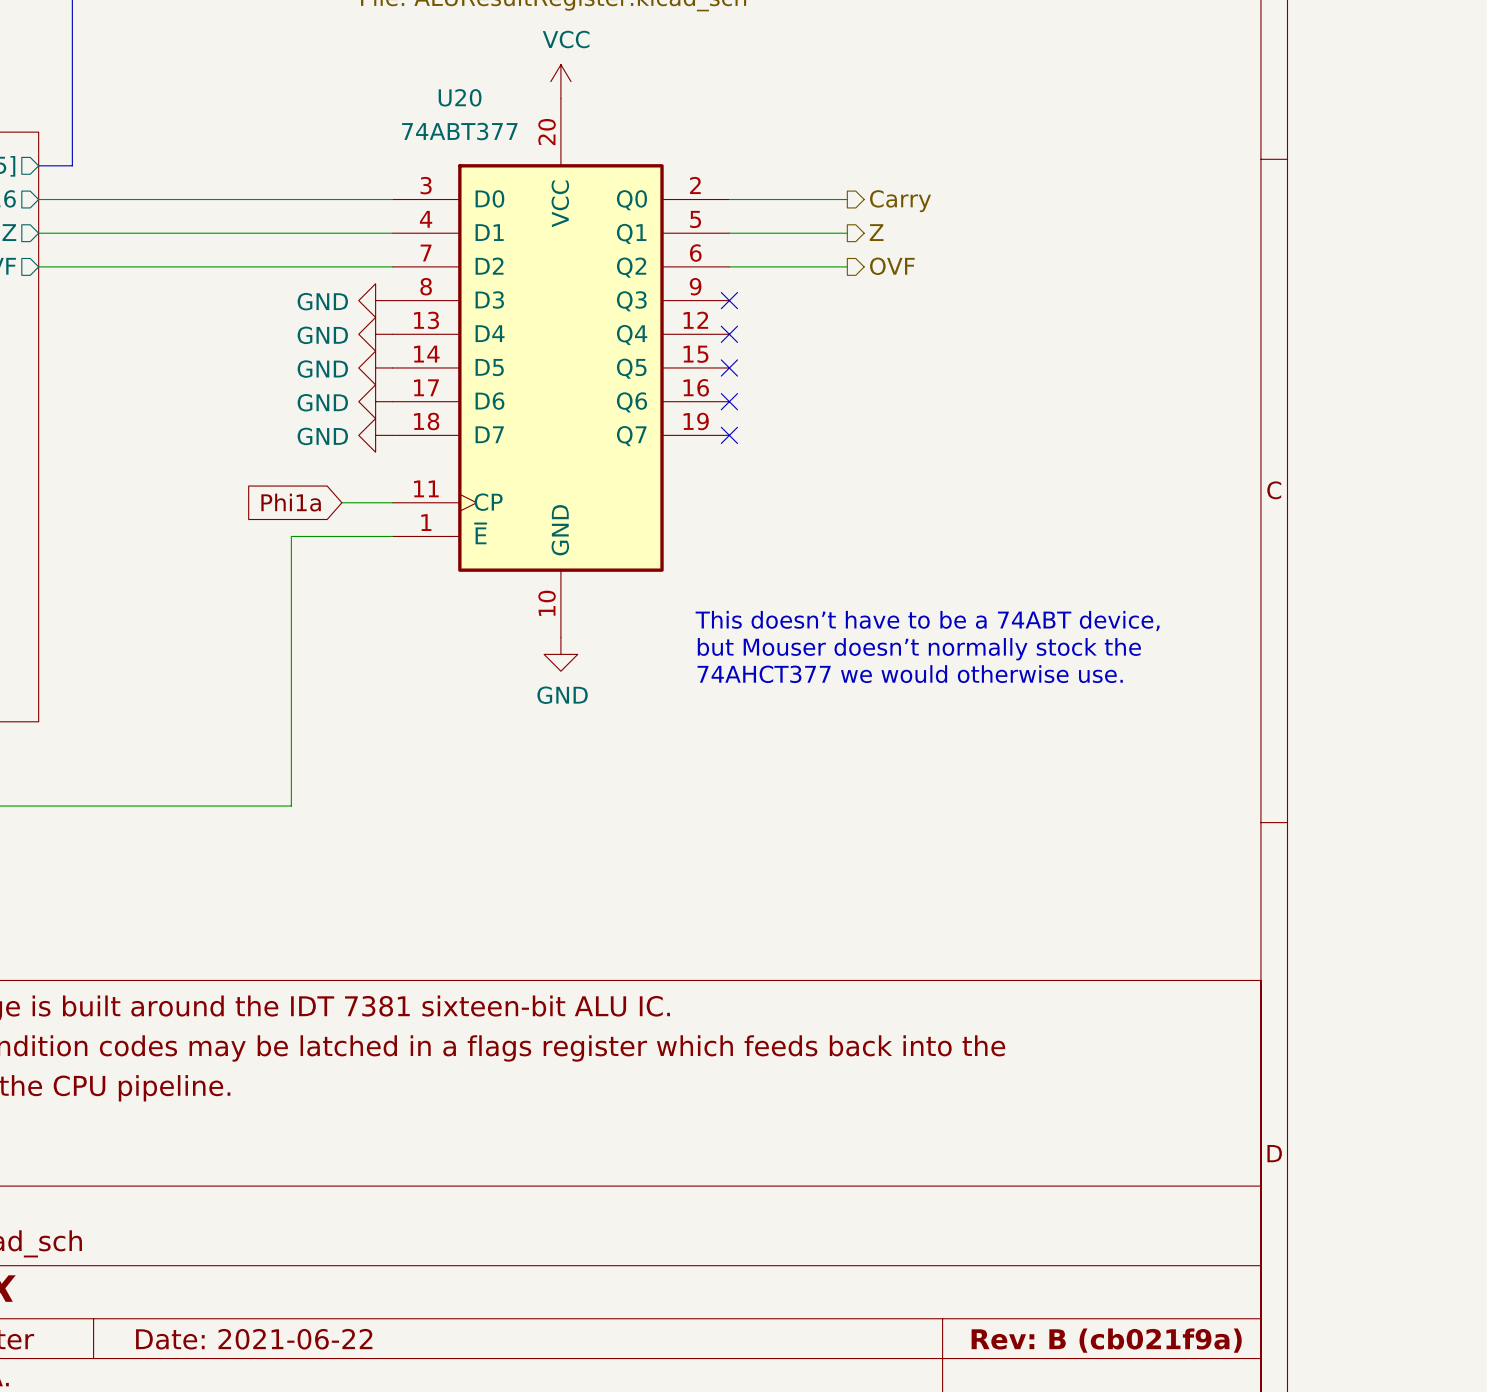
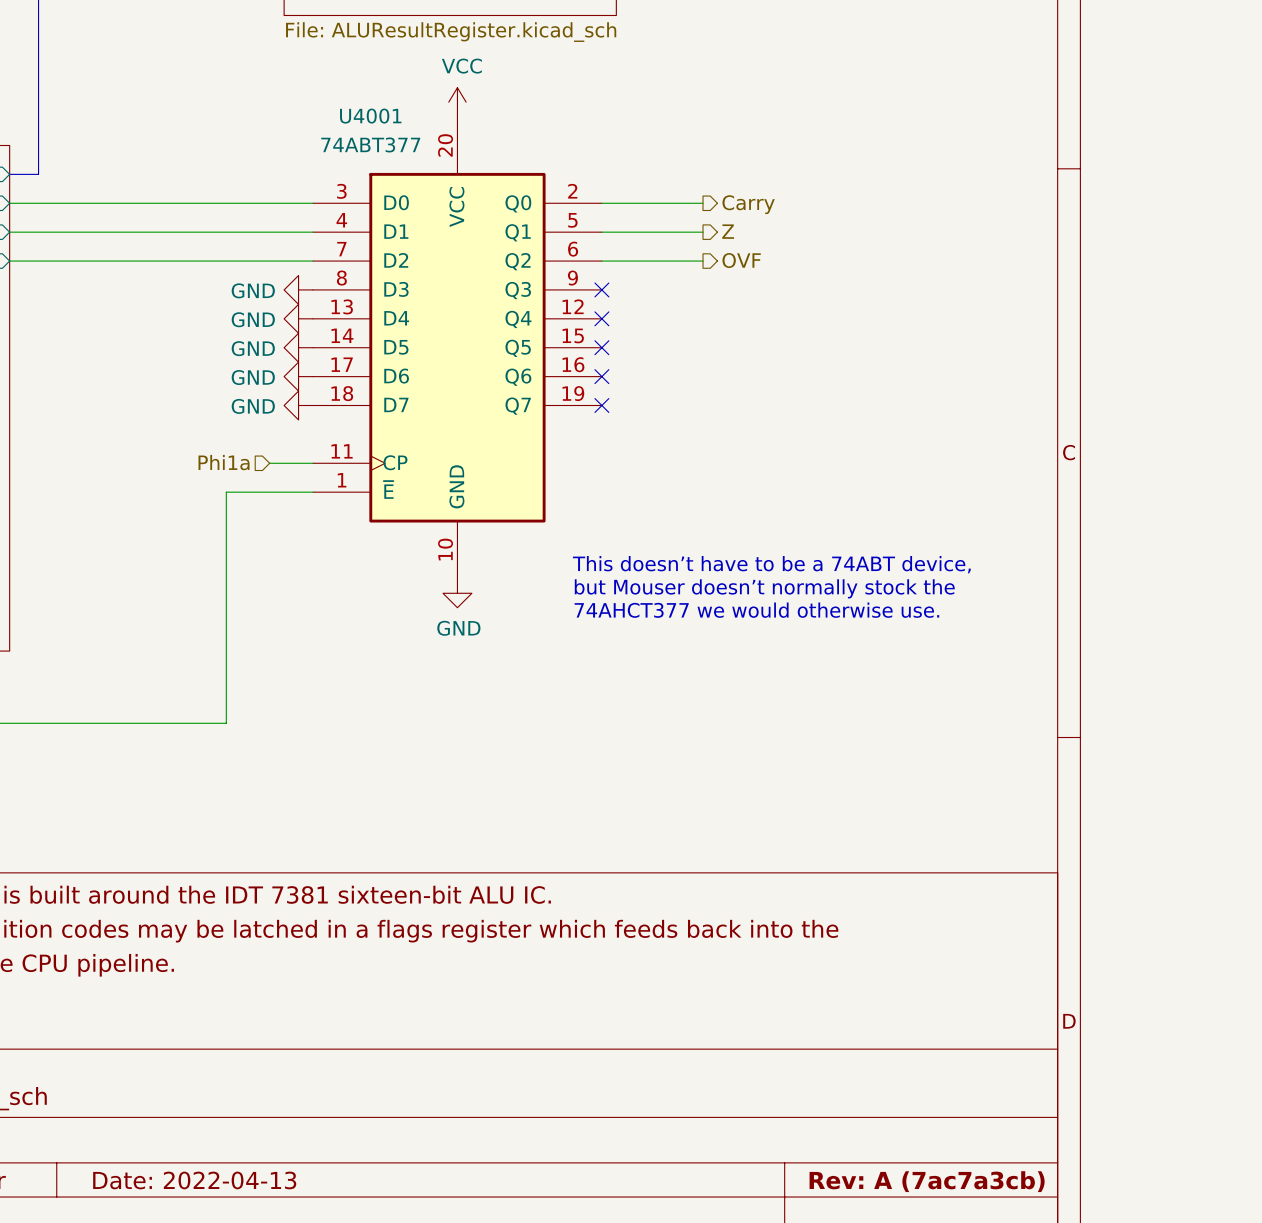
U20 name: U20 (460, 97) -> U4001 (370, 116)
hierarchical label: none -> Phi1a (224, 462)
global label: Phi1a (291, 502) -> none
title block: Date: 2021-06-22 (254, 1339) -> Date: 2022-04-13 (194, 1180)
title block: Rev: B (cb021f9a) (1106, 1340) -> Rev: A (7ac7a3cb) (927, 1181)

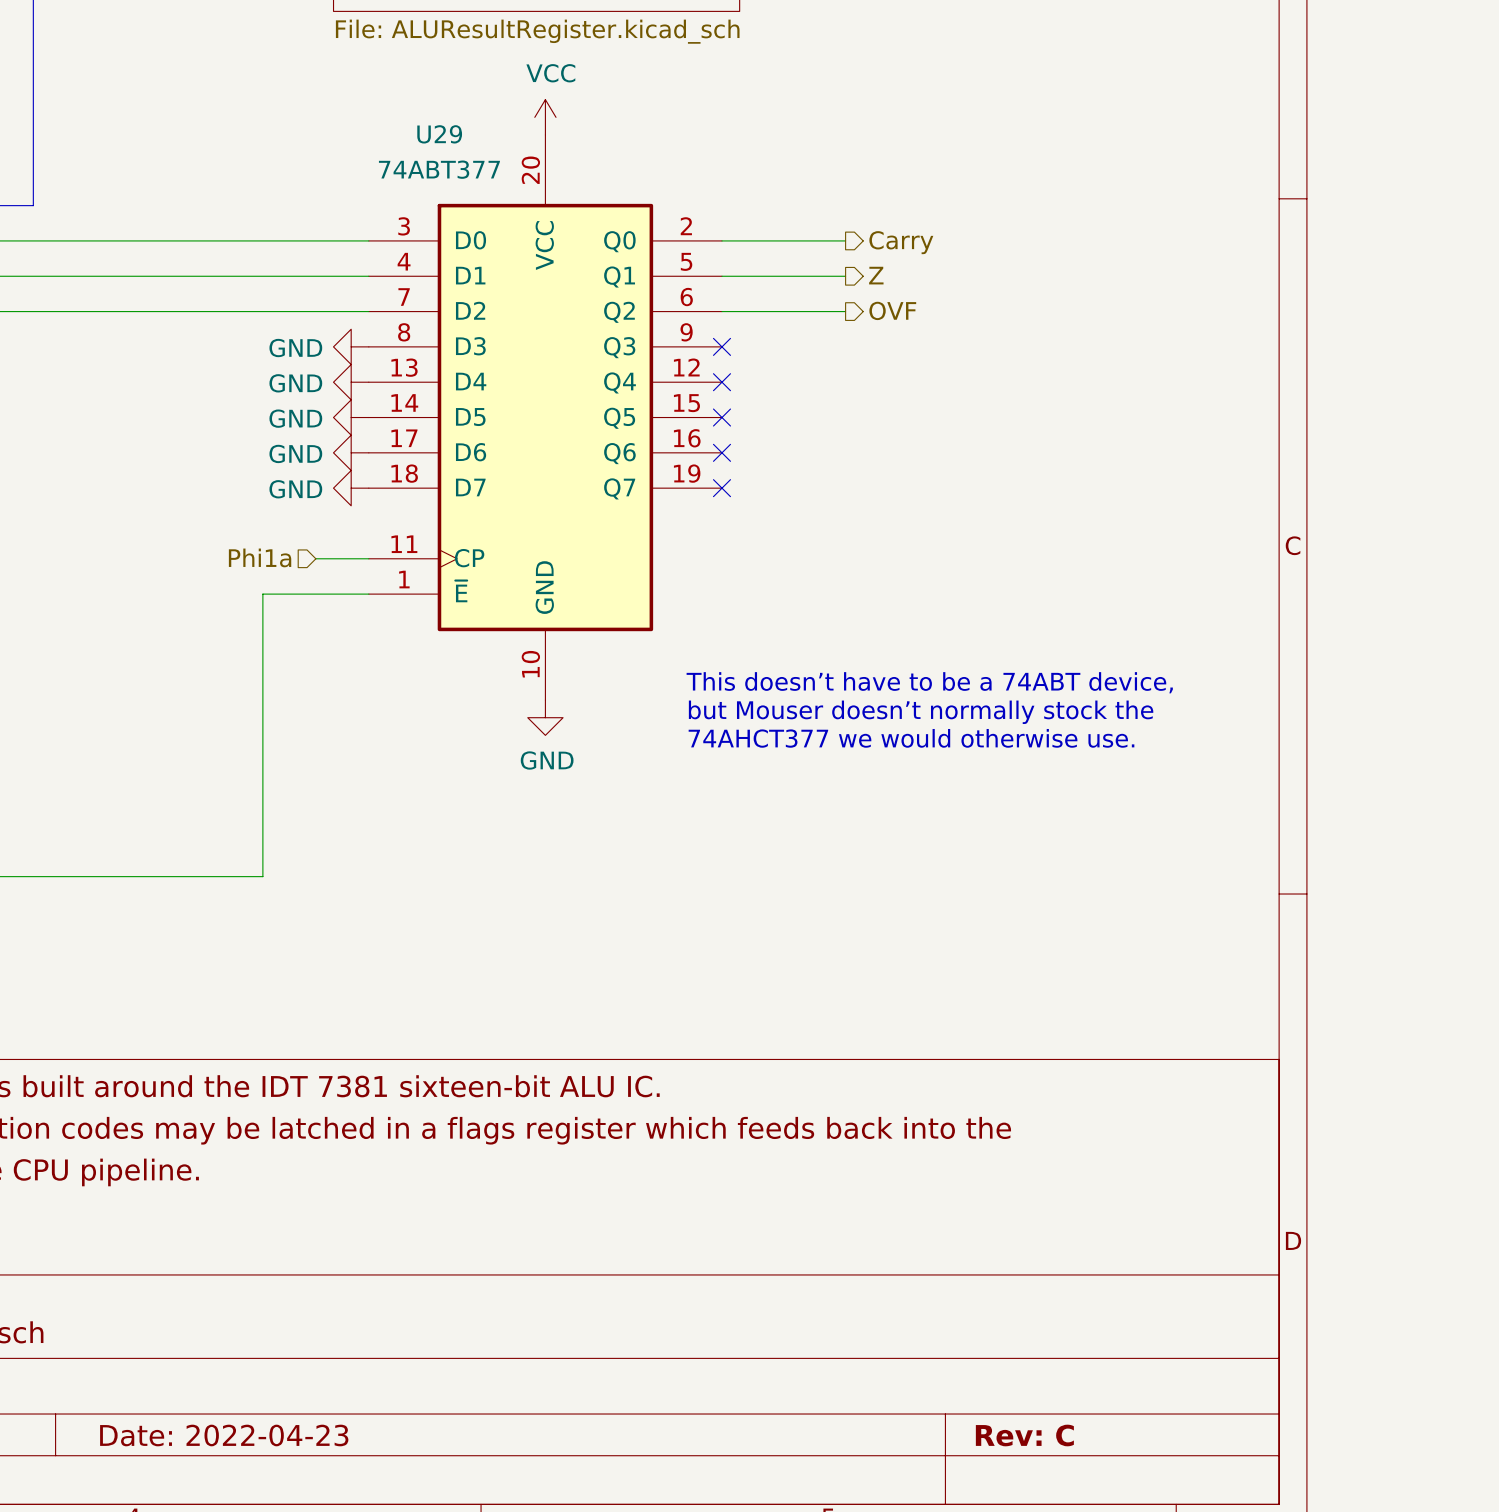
U4001 name: U4001 (370, 116) -> U29 (439, 134)
title block: Date: 2022-04-13 (194, 1180) -> Date: 2022-04-23 (224, 1435)
title block: Rev: A (7ac7a3cb) (927, 1181) -> Rev: C (1024, 1435)

